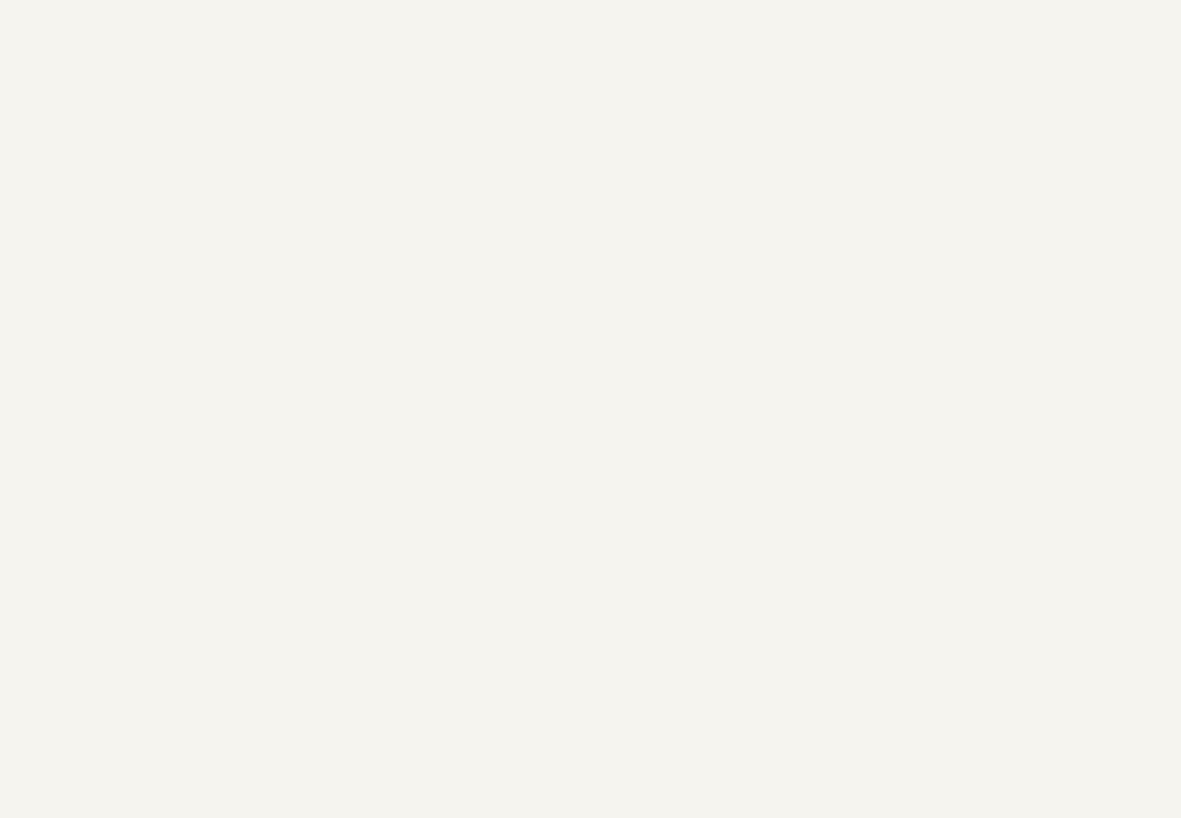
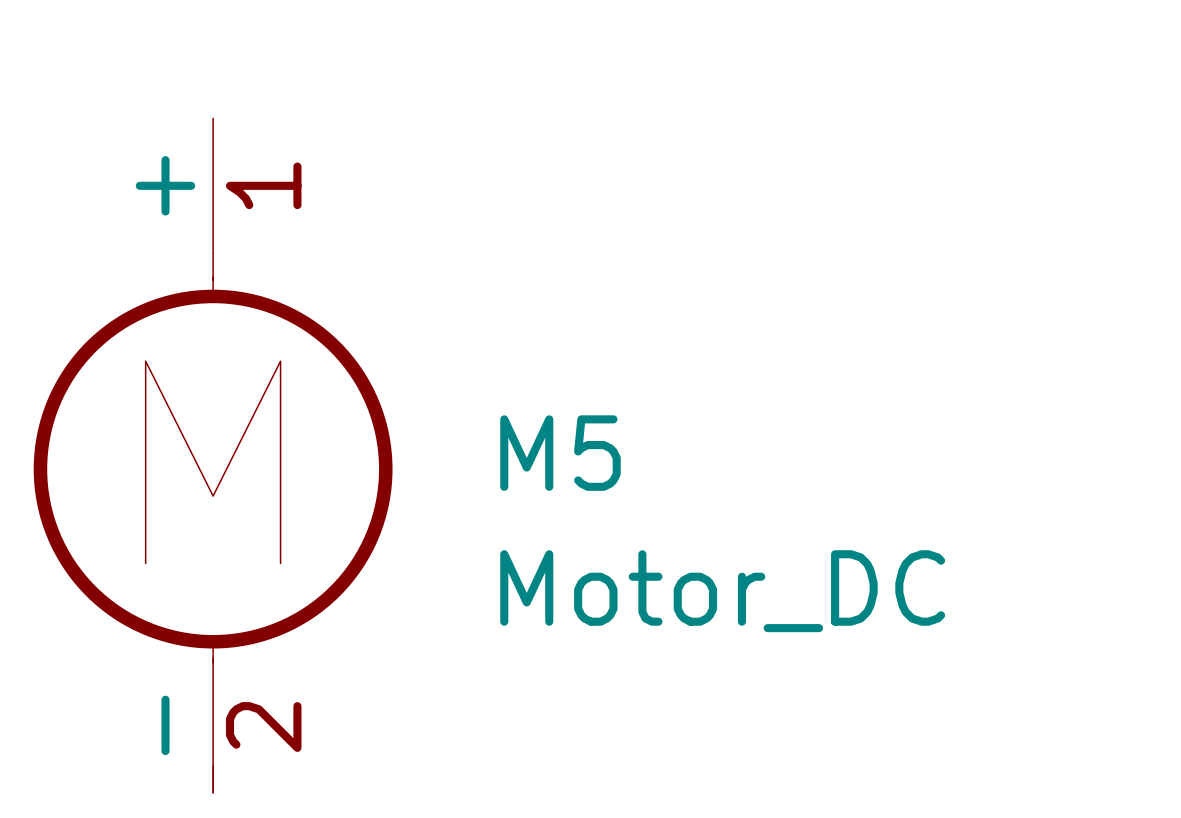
M5: none -> Motor_DC (213, 455)

